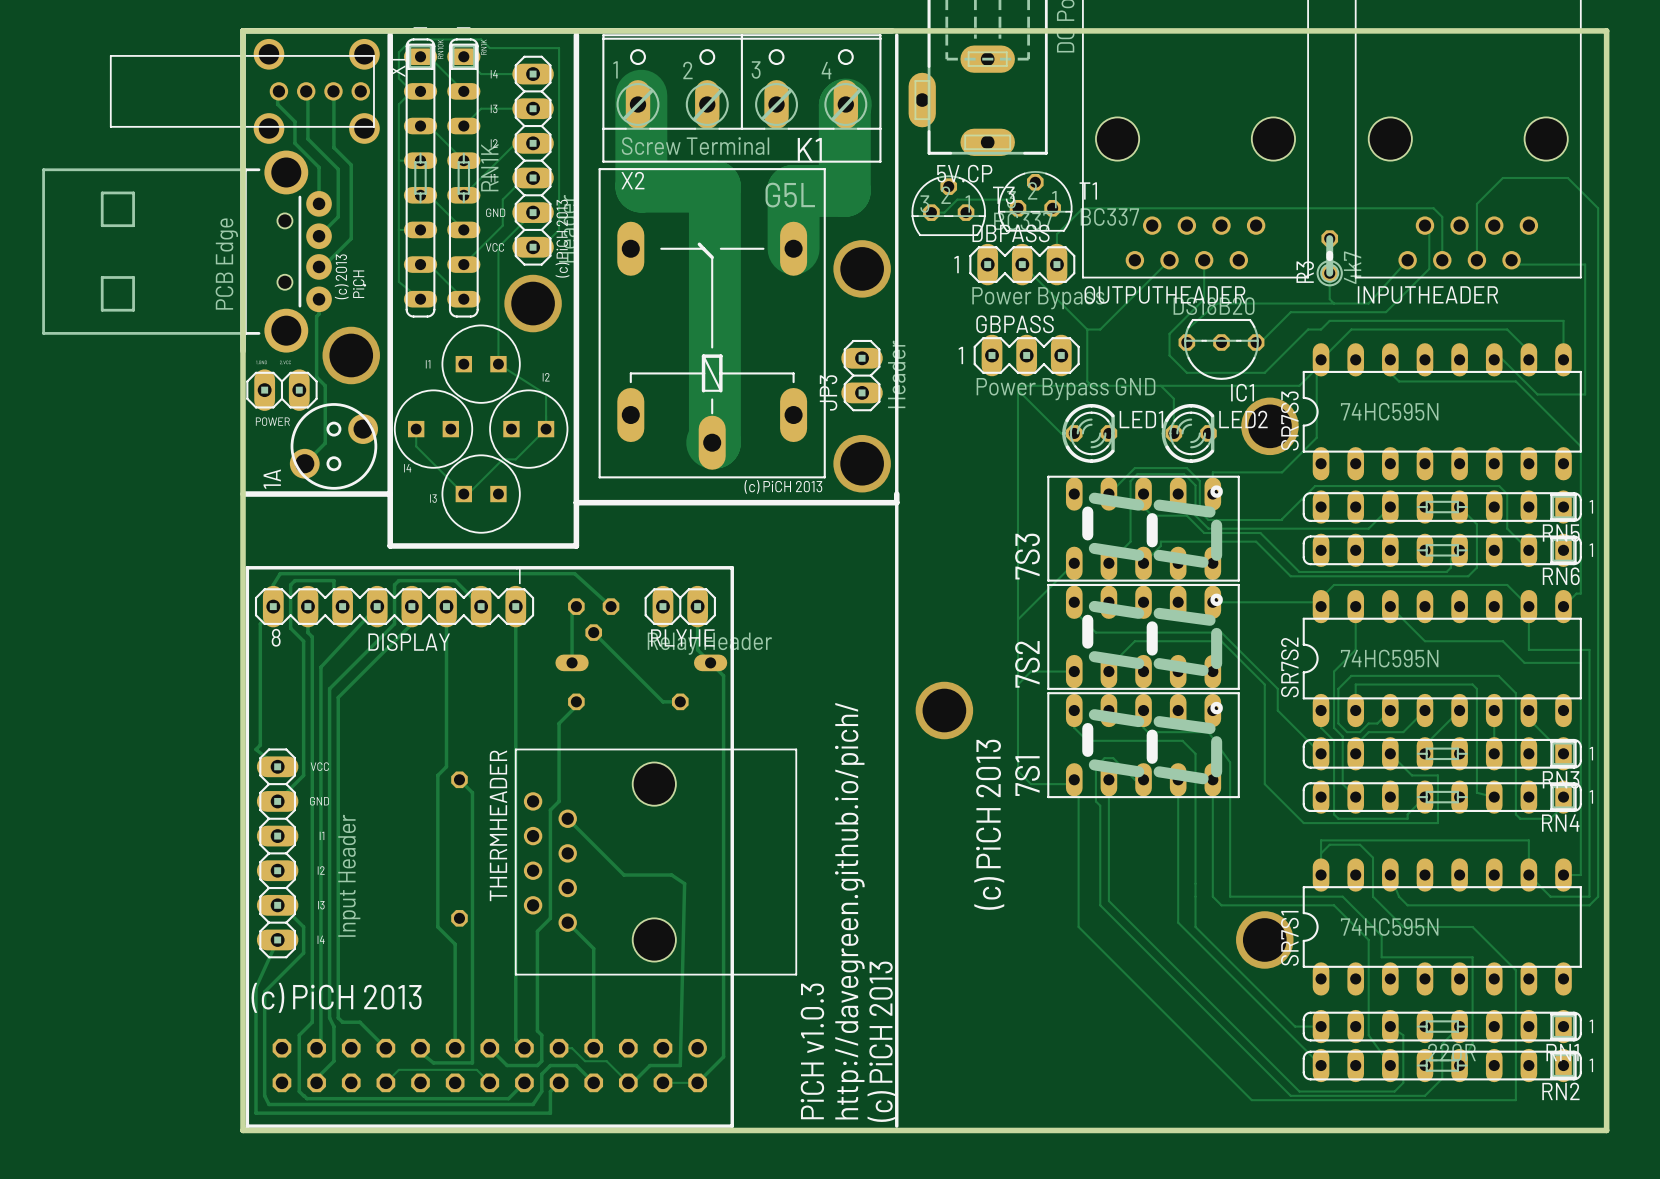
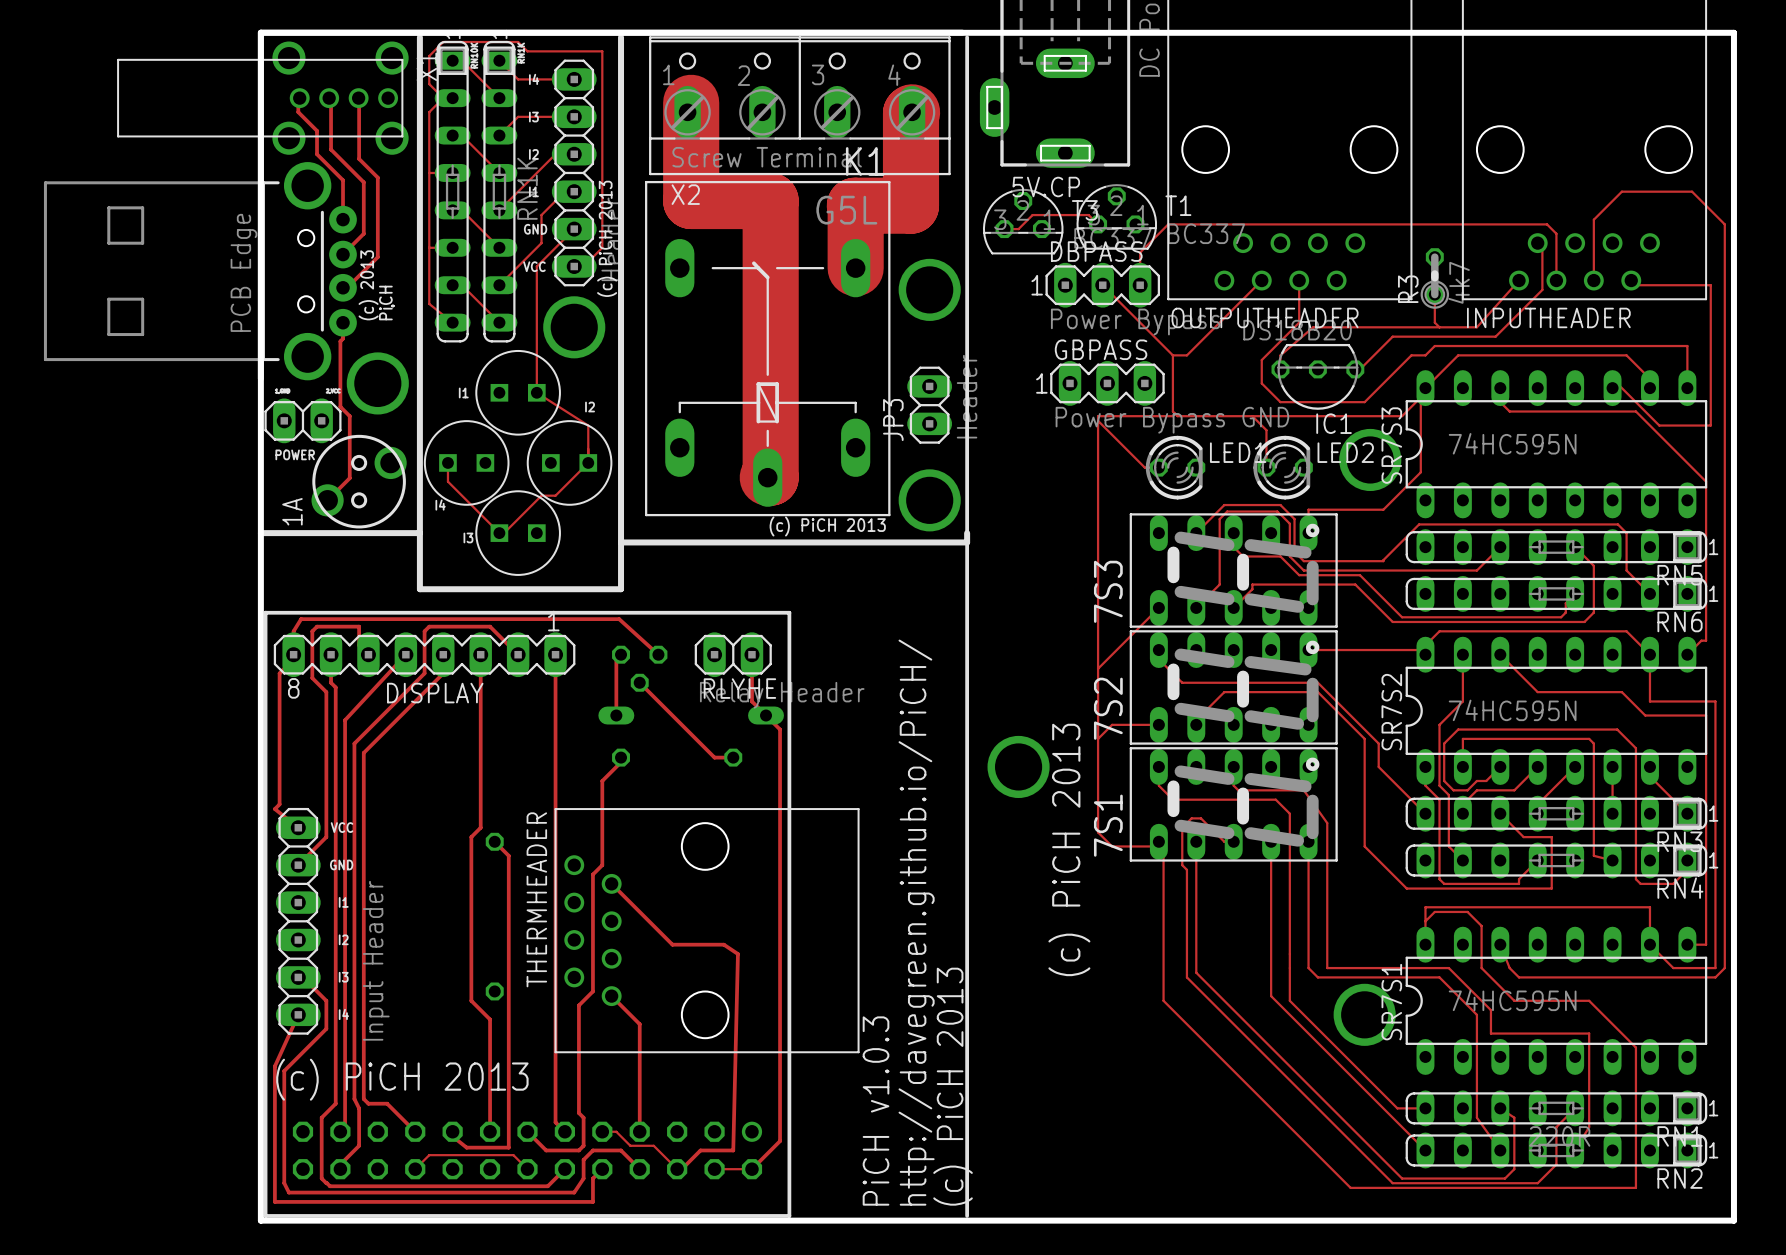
text: http://davegreen.github.io/pich/ (849, 911) -> http://davegreen.github.io/PiCH/ (916, 922)

